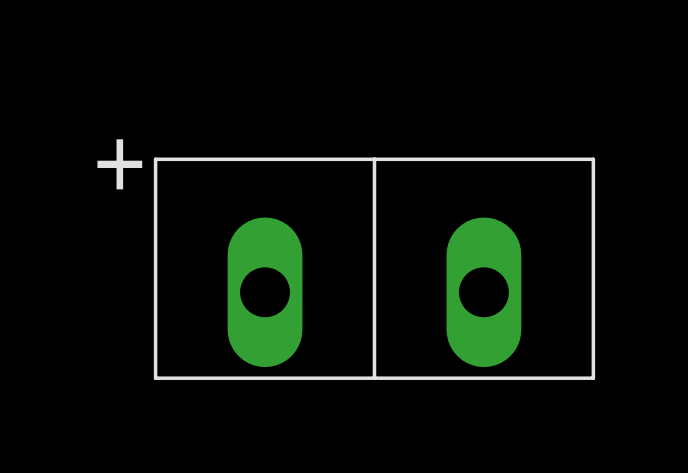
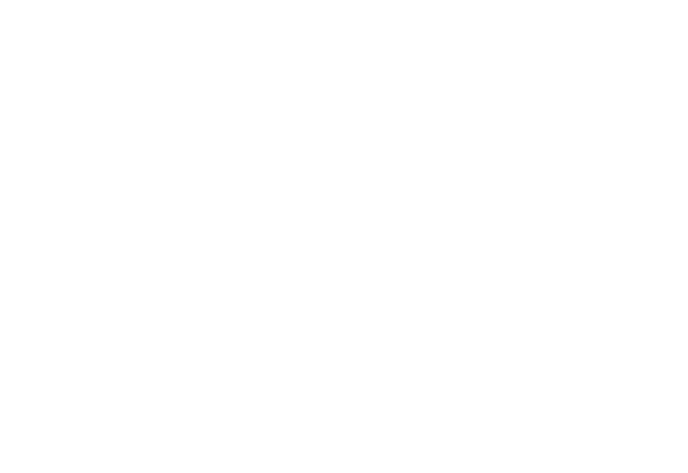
part: (374, 268) -> none

